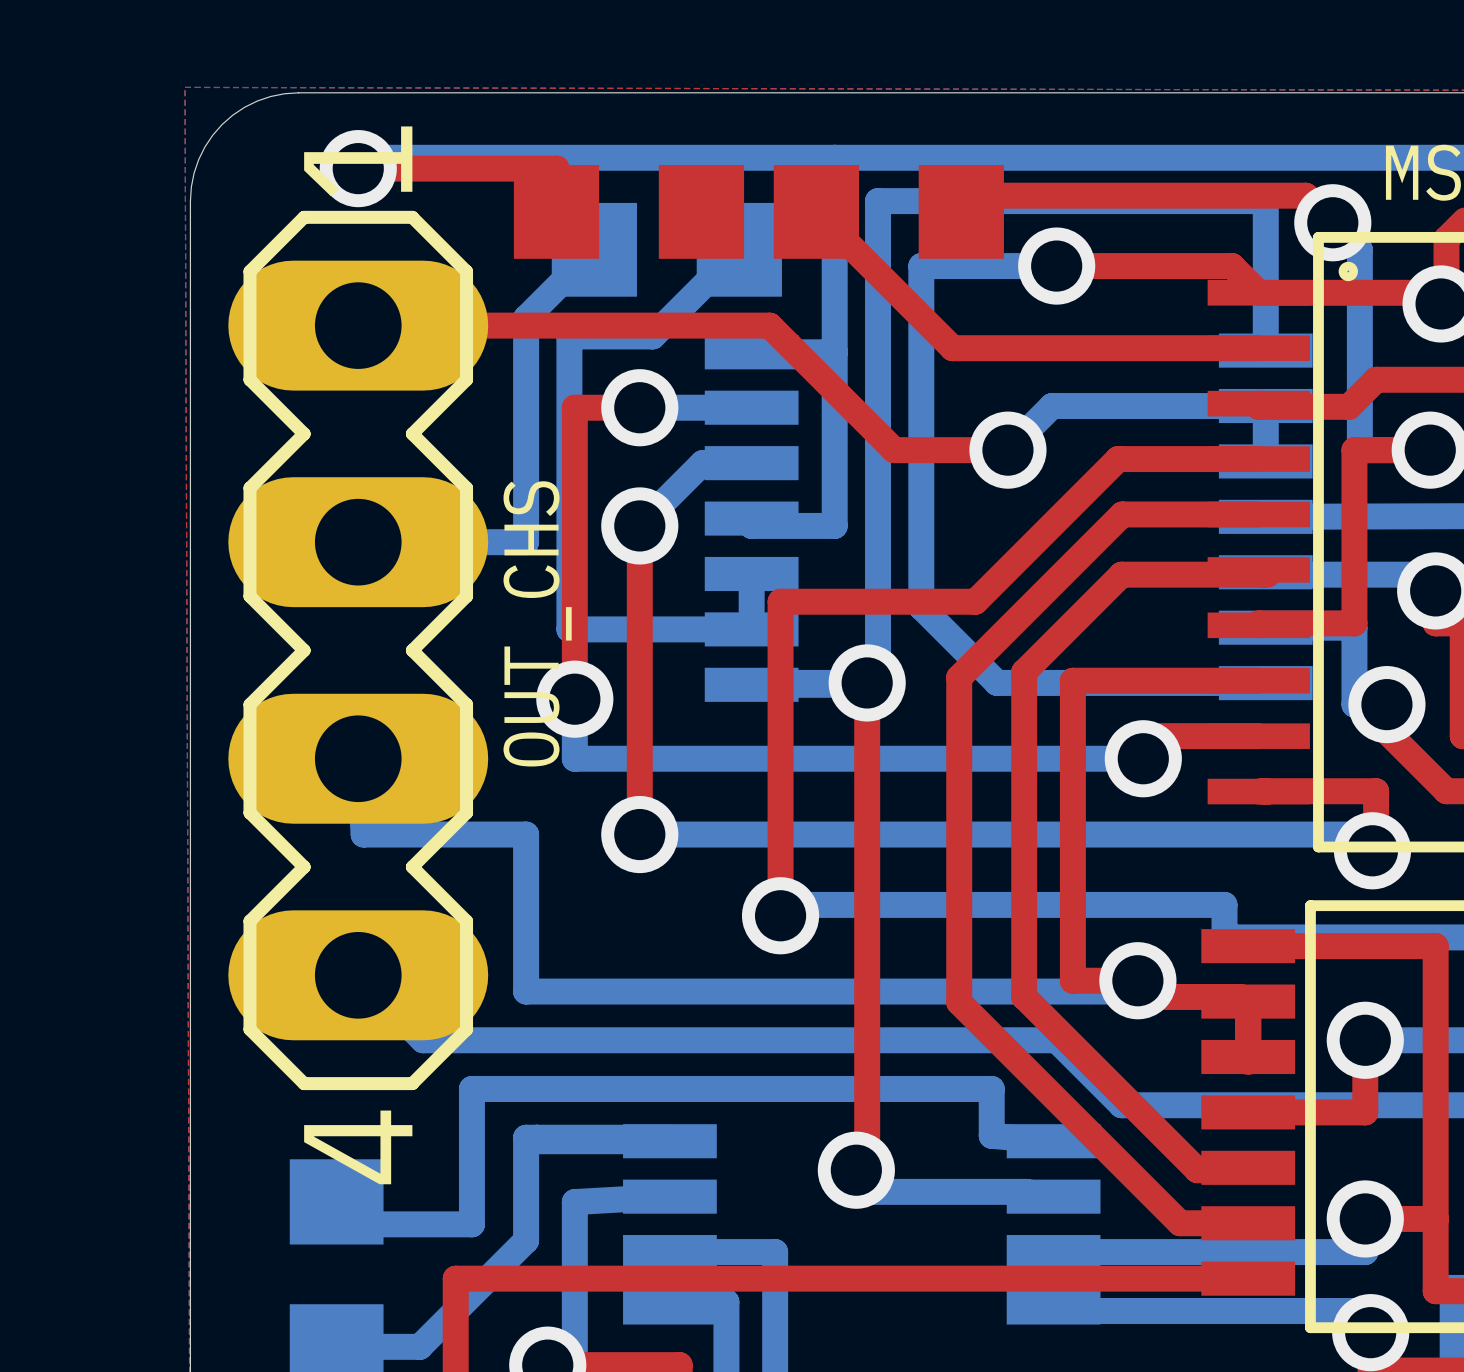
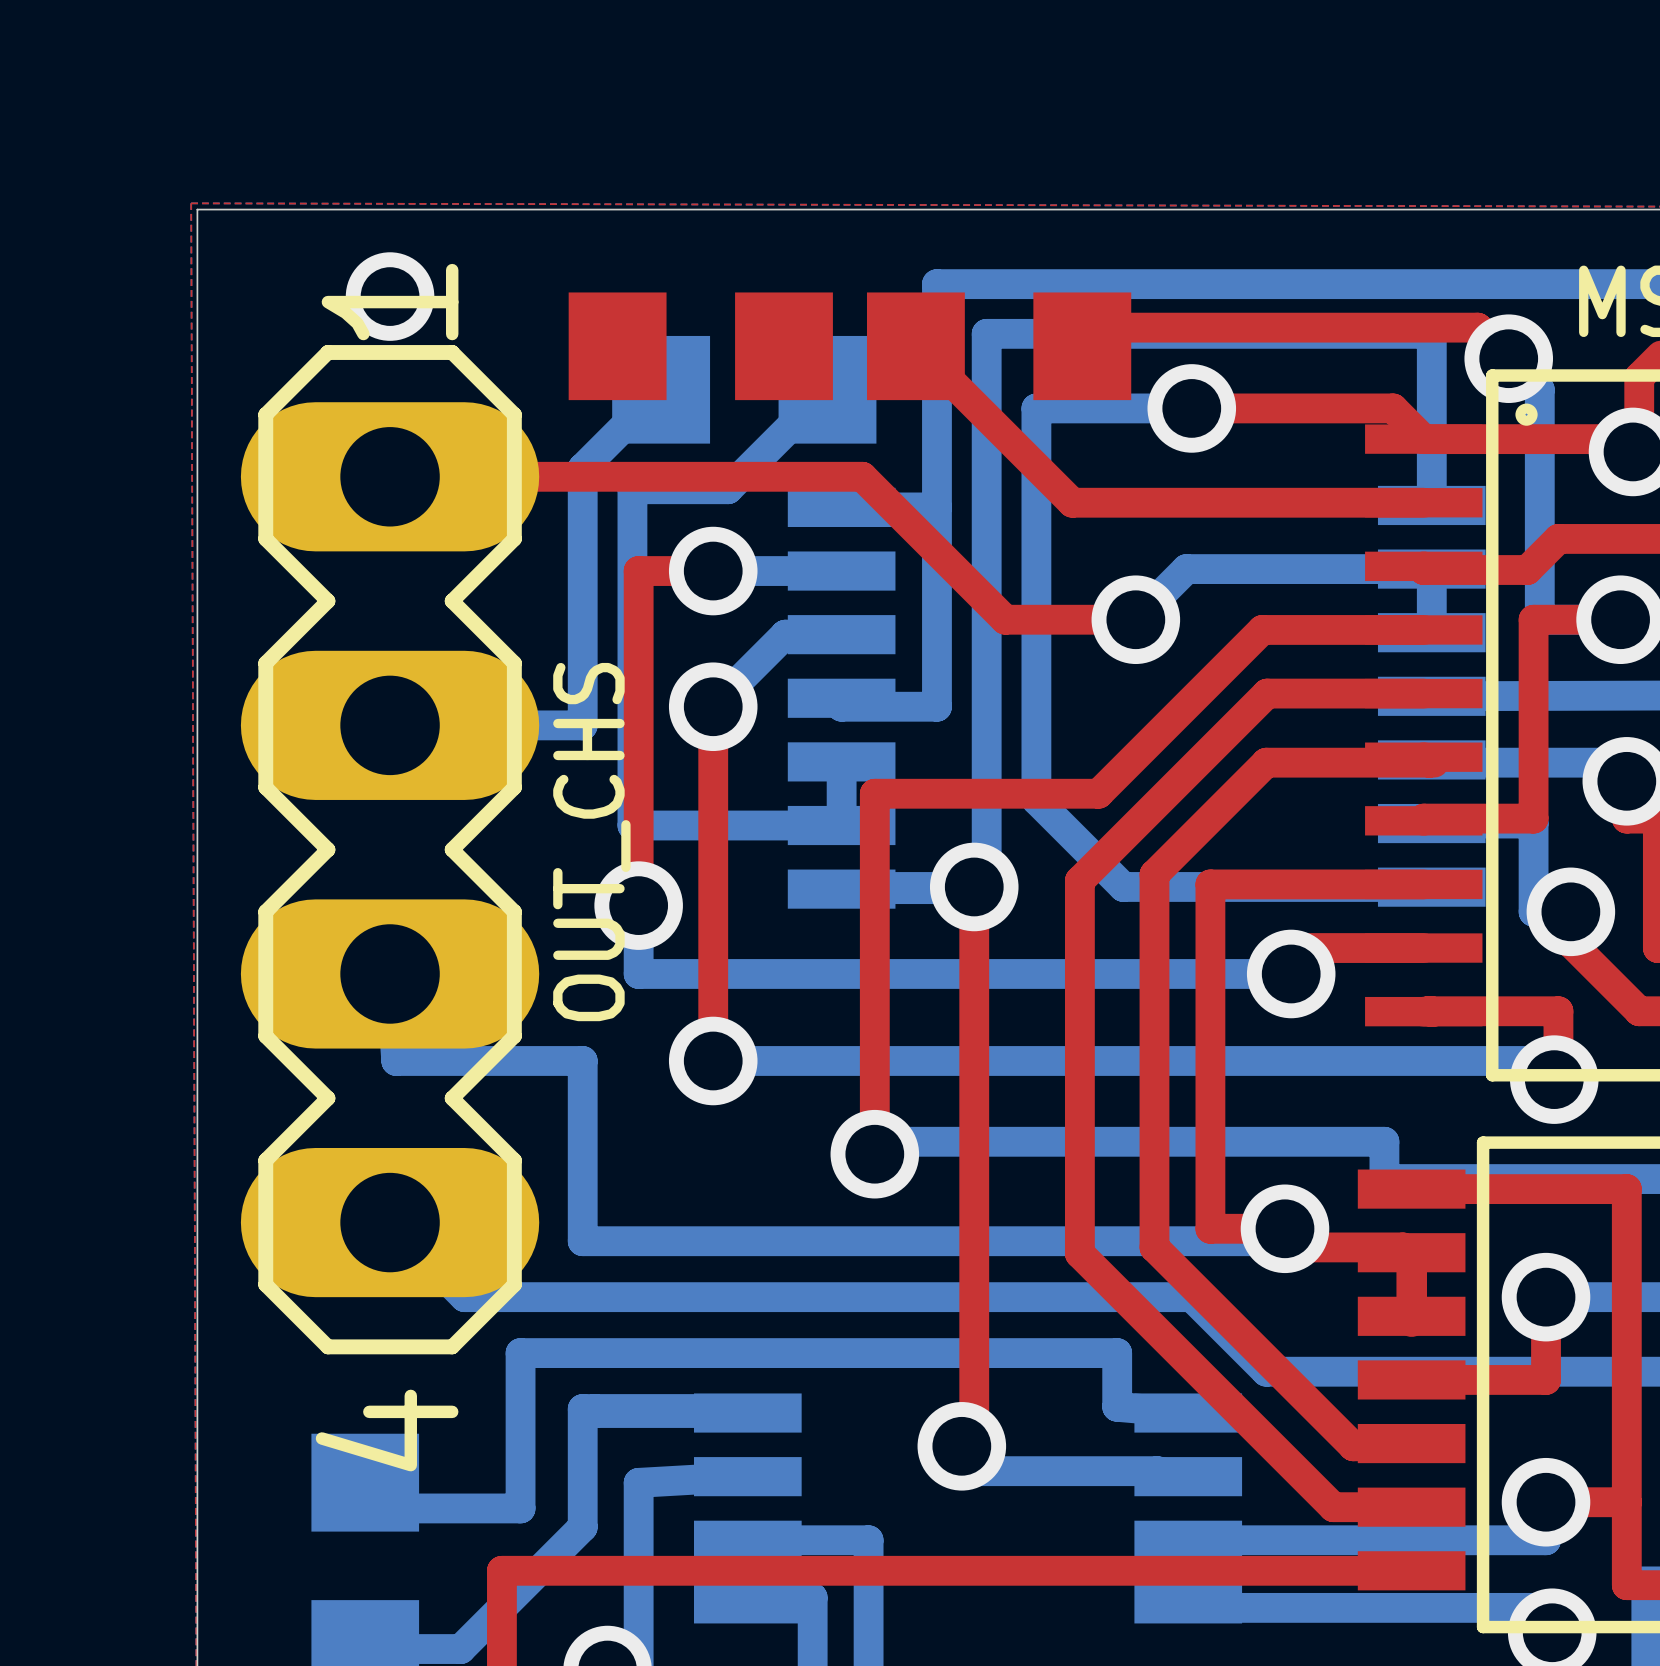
board edge: (298, 92) (270, 96) (257, 101) (244, 107) (222, 124) (204, 146) (198, 159) (194, 173) (190, 201) -> (321, 209) (197, 209) (197, 333)
bottom track: (834, 157) (358, 157) (358, 168) -> none
top track: (358, 168) (556, 168) (556, 211) -> none

